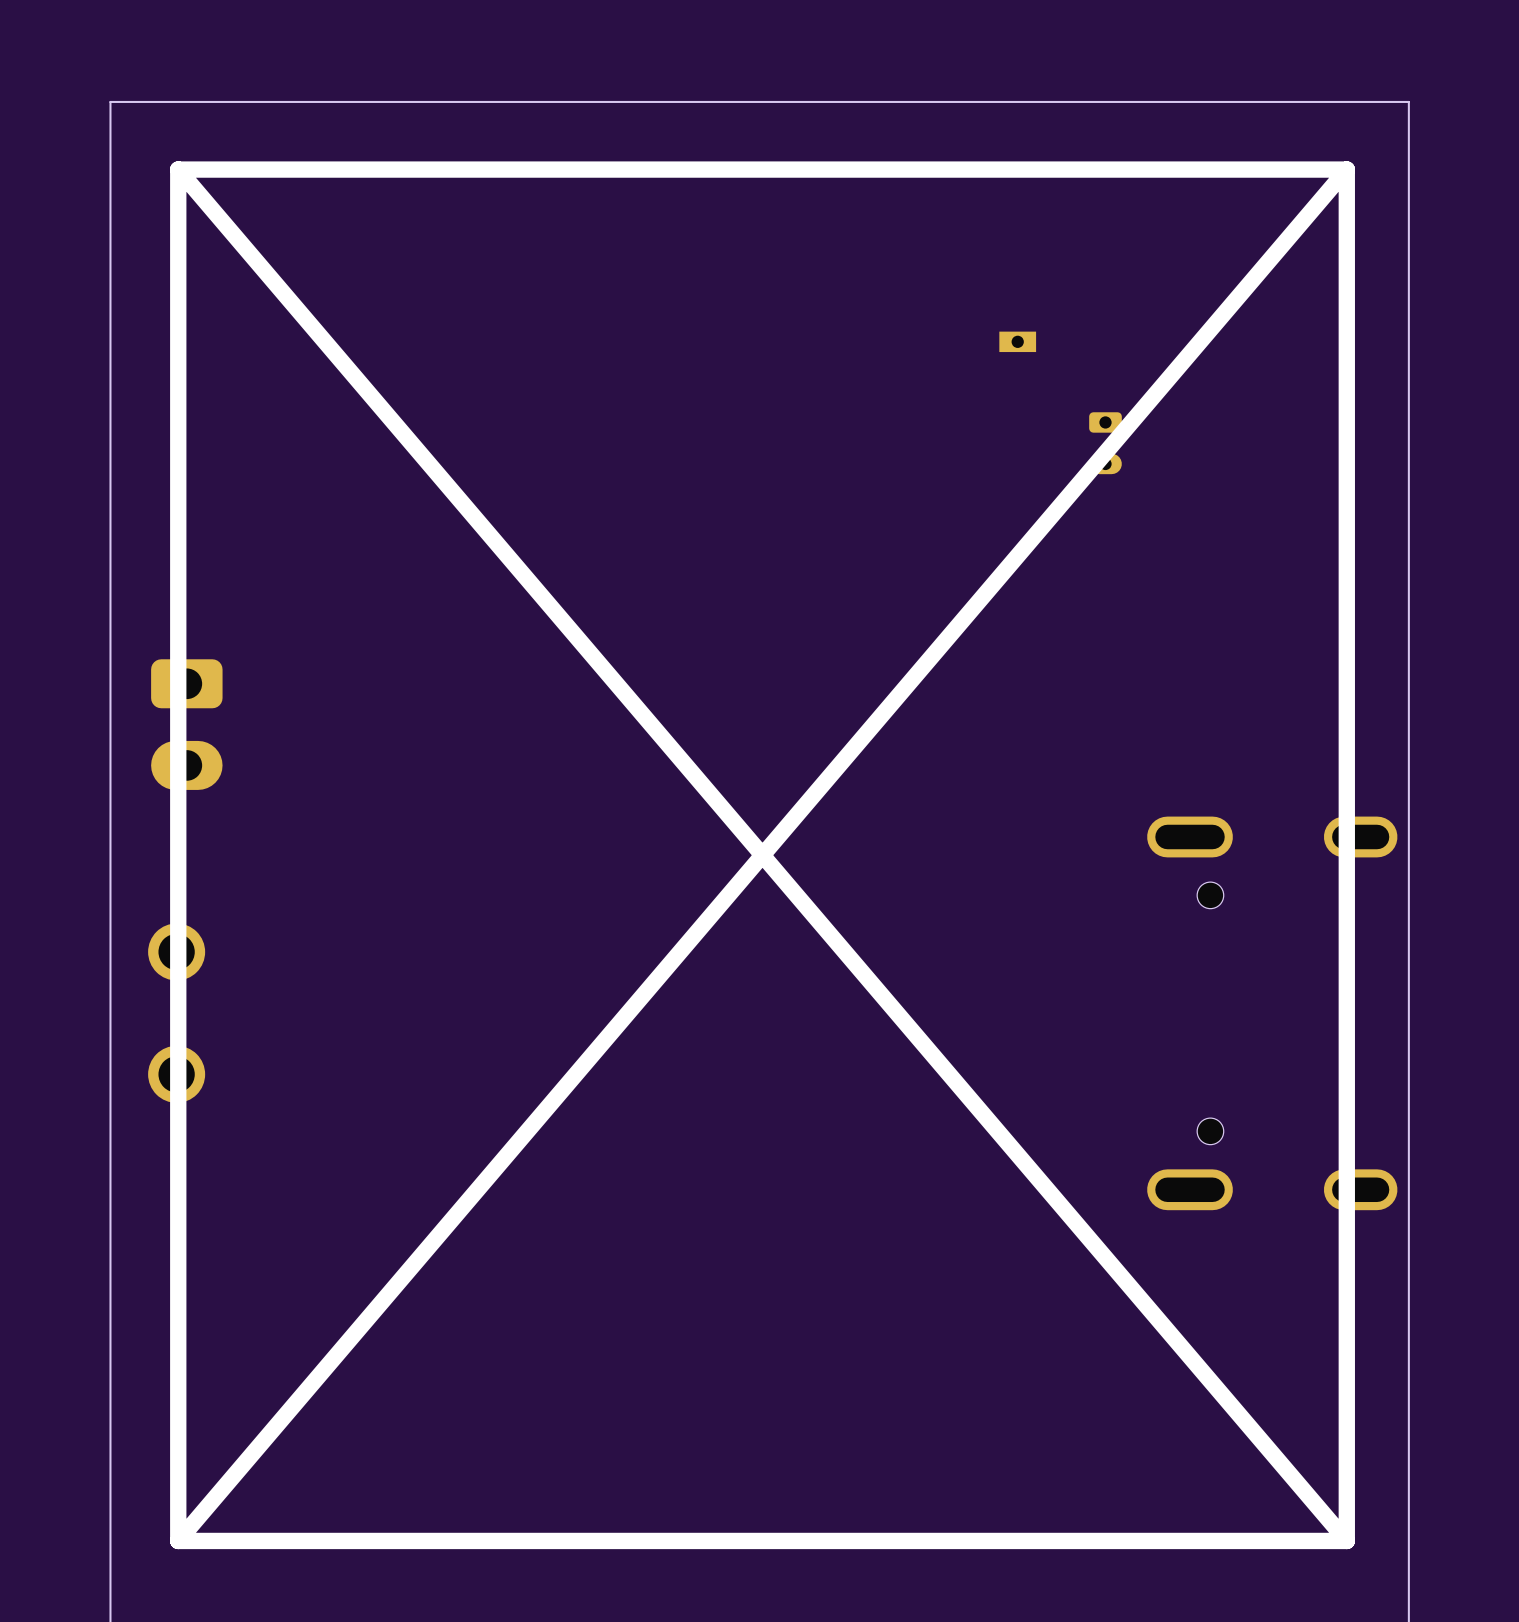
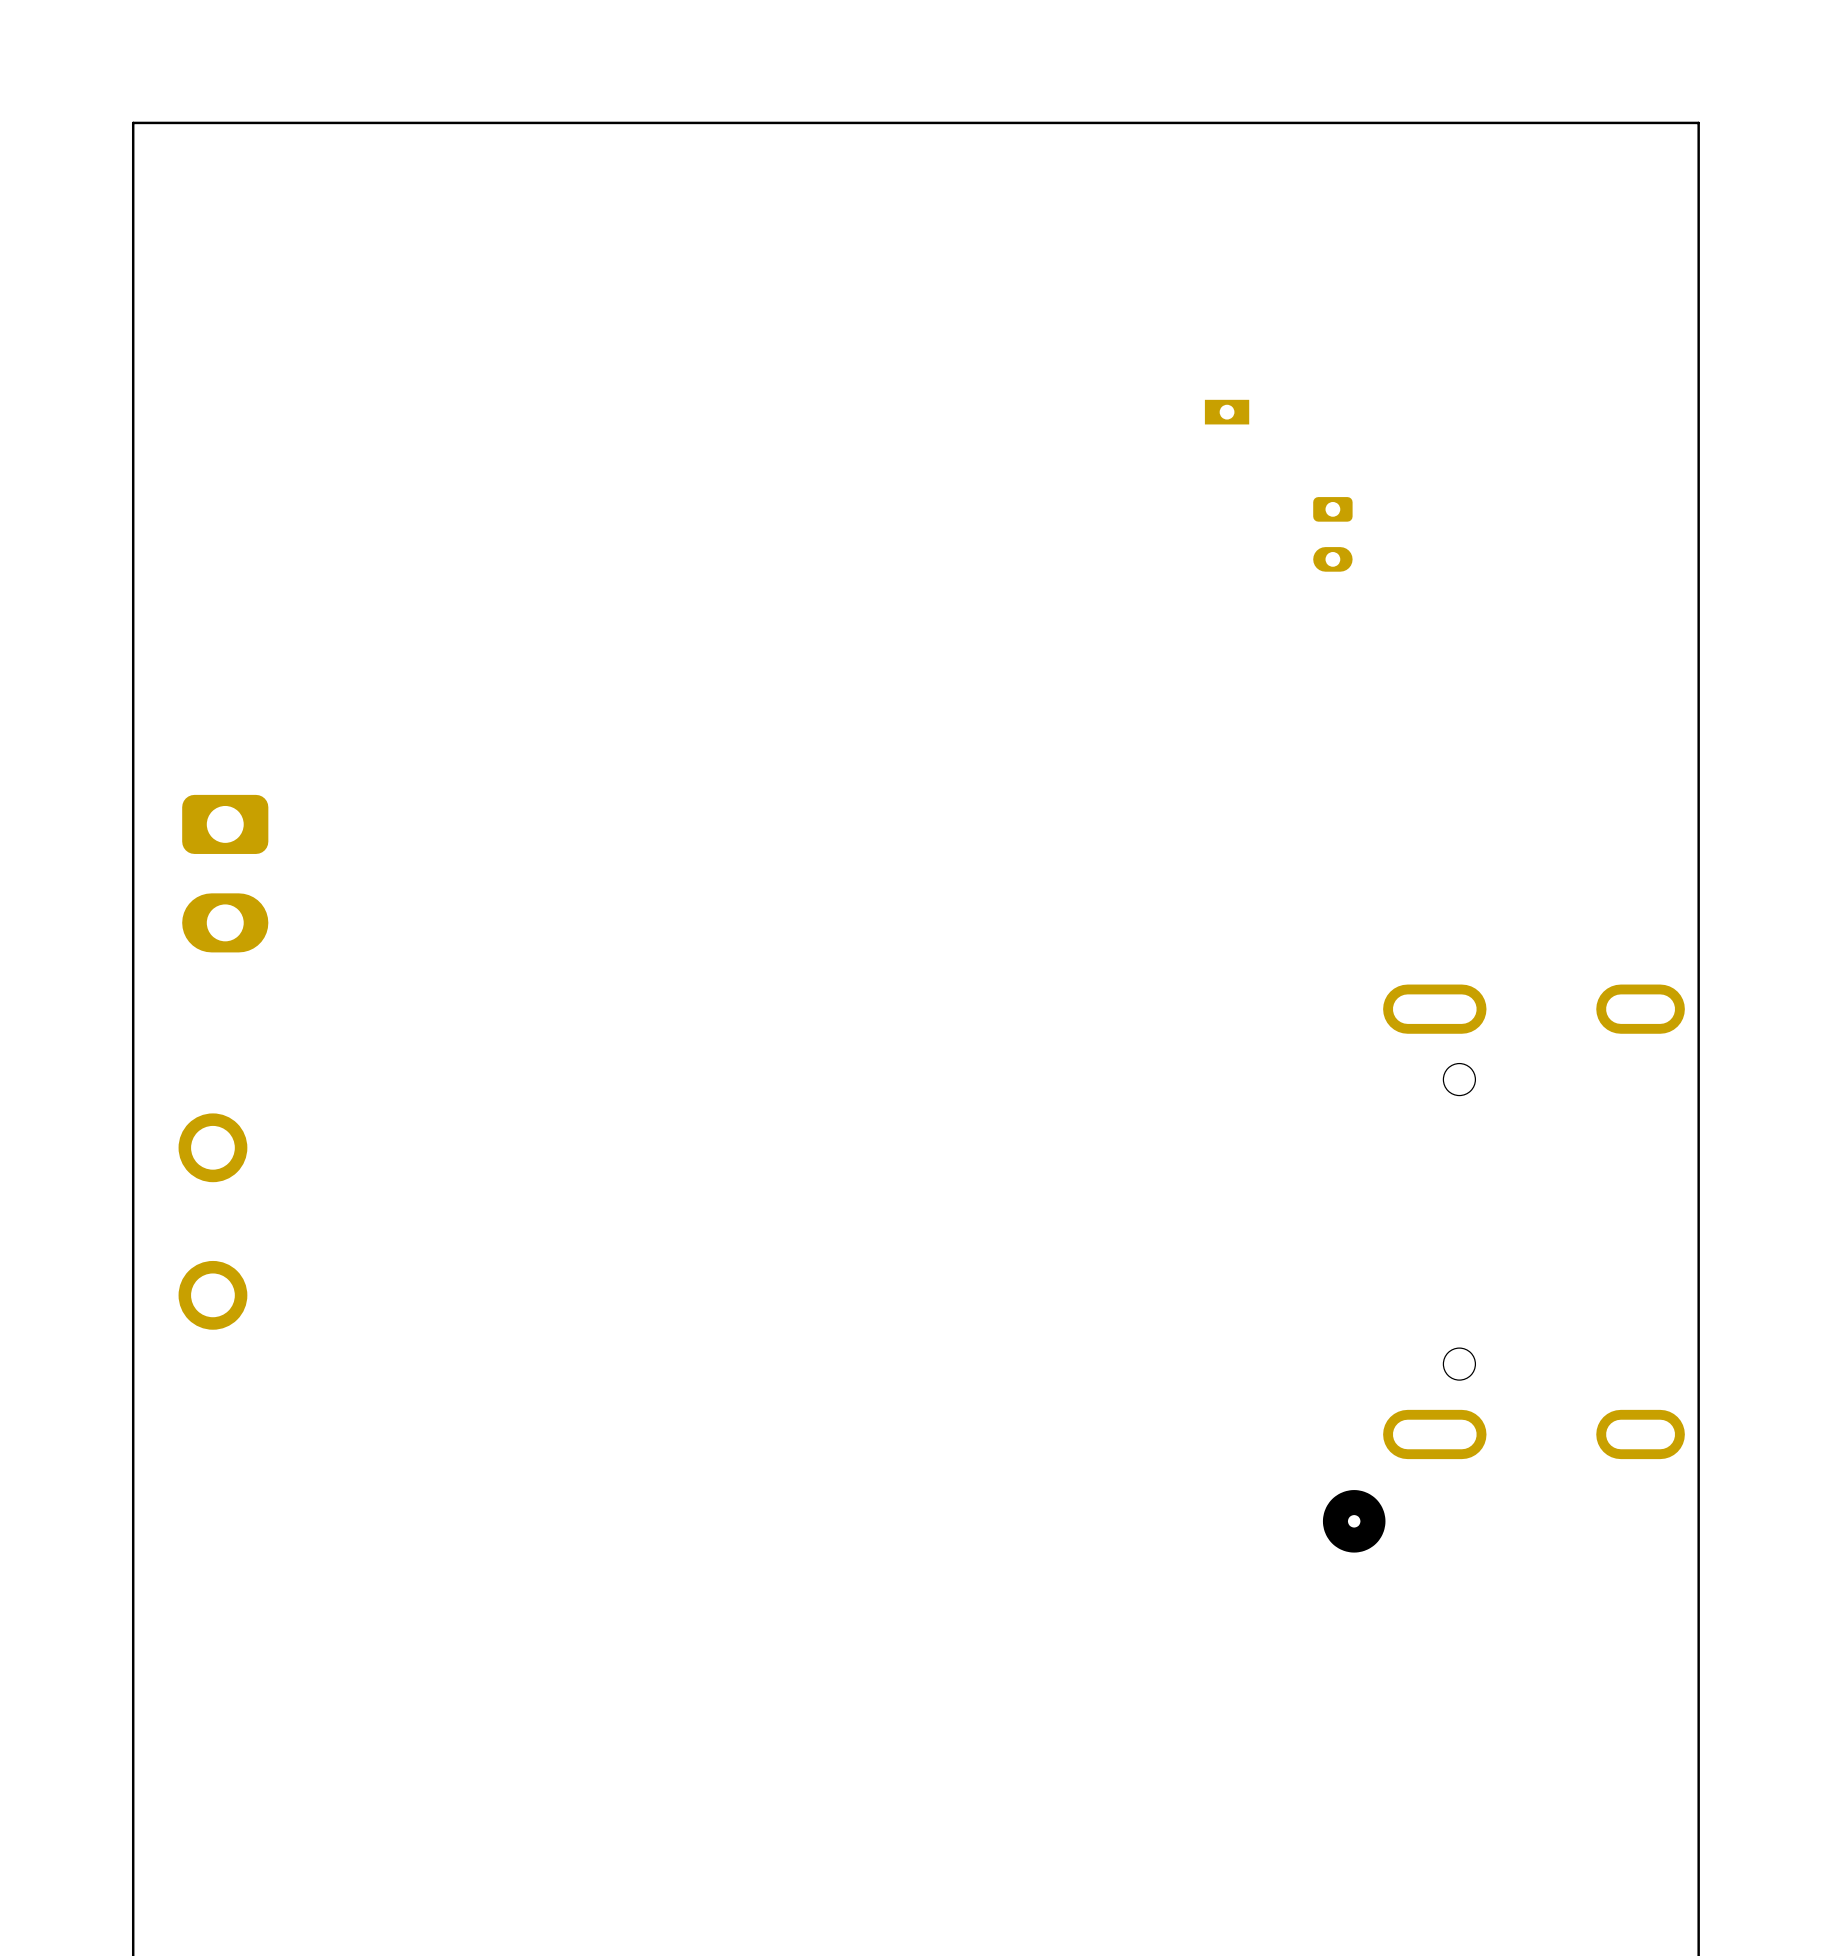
line: (178, 169) (178, 1540) -> none
line: (178, 169) (1346, 1540) -> none
line: (1346, 169) (178, 169) -> none
line: (1346, 169) (1346, 1540) -> none
line: (1346, 169) (178, 1540) -> none
part: none -> (1354, 1521)
line: (1346, 1540) (178, 1540) -> none

